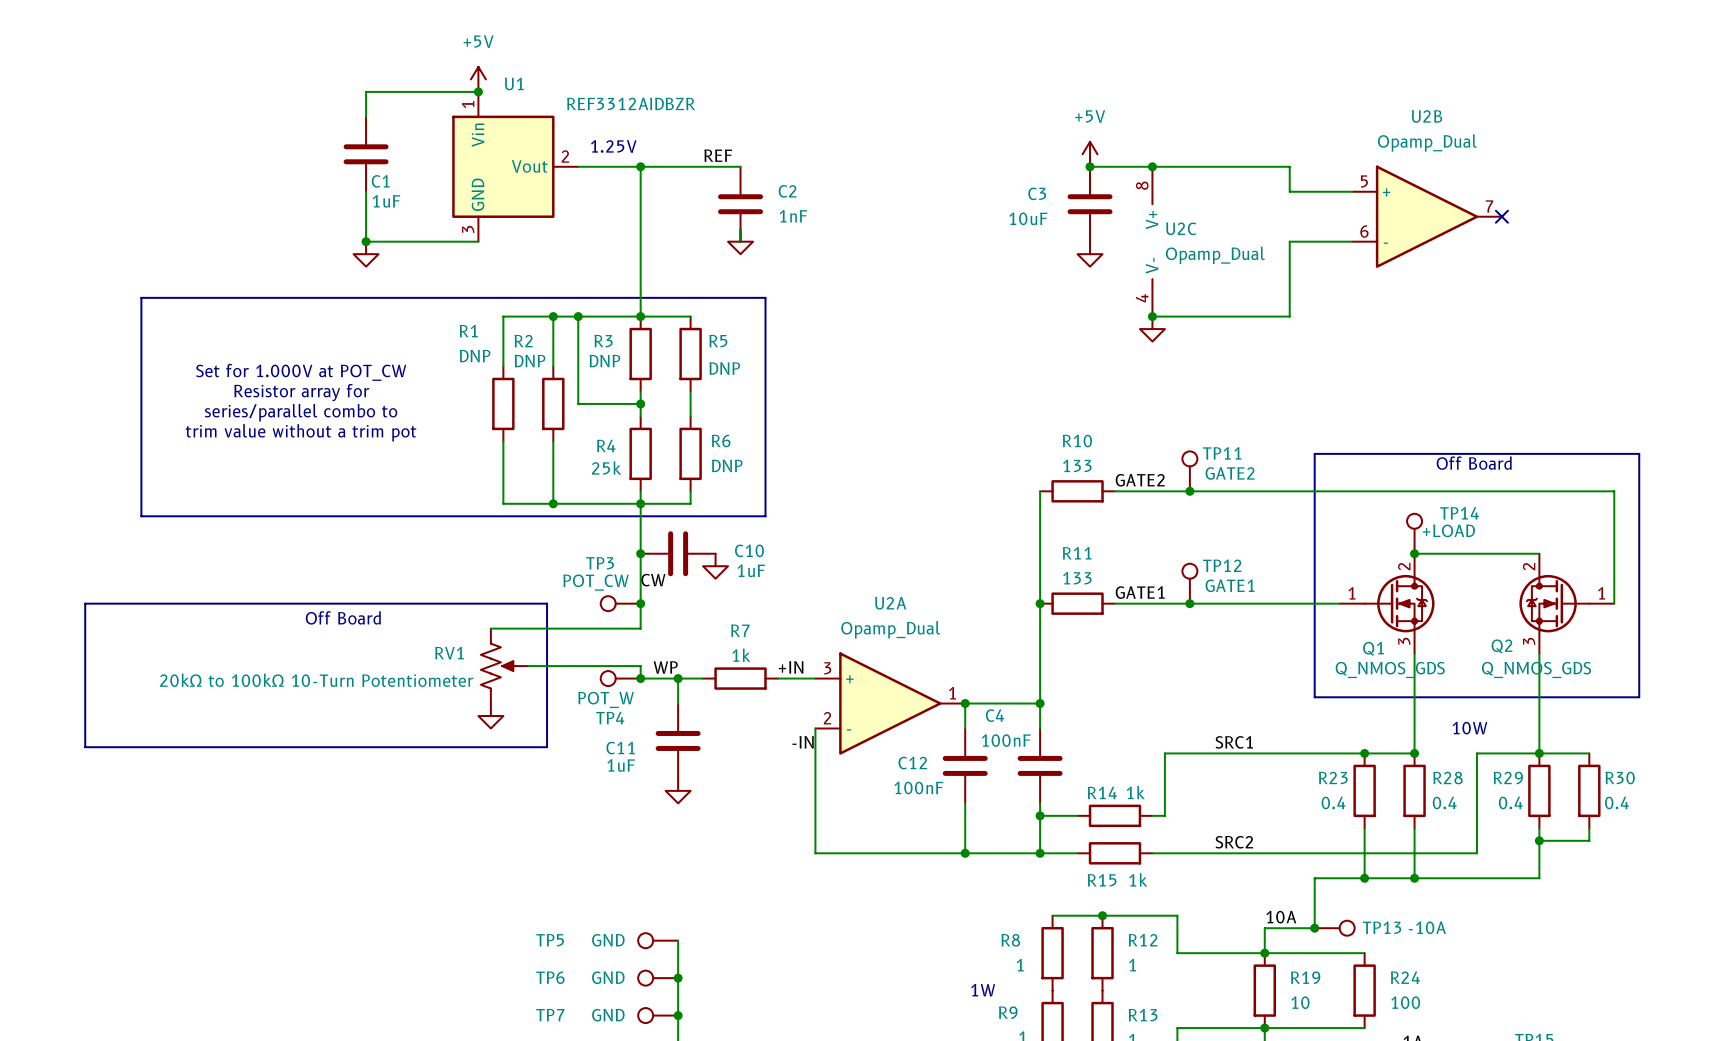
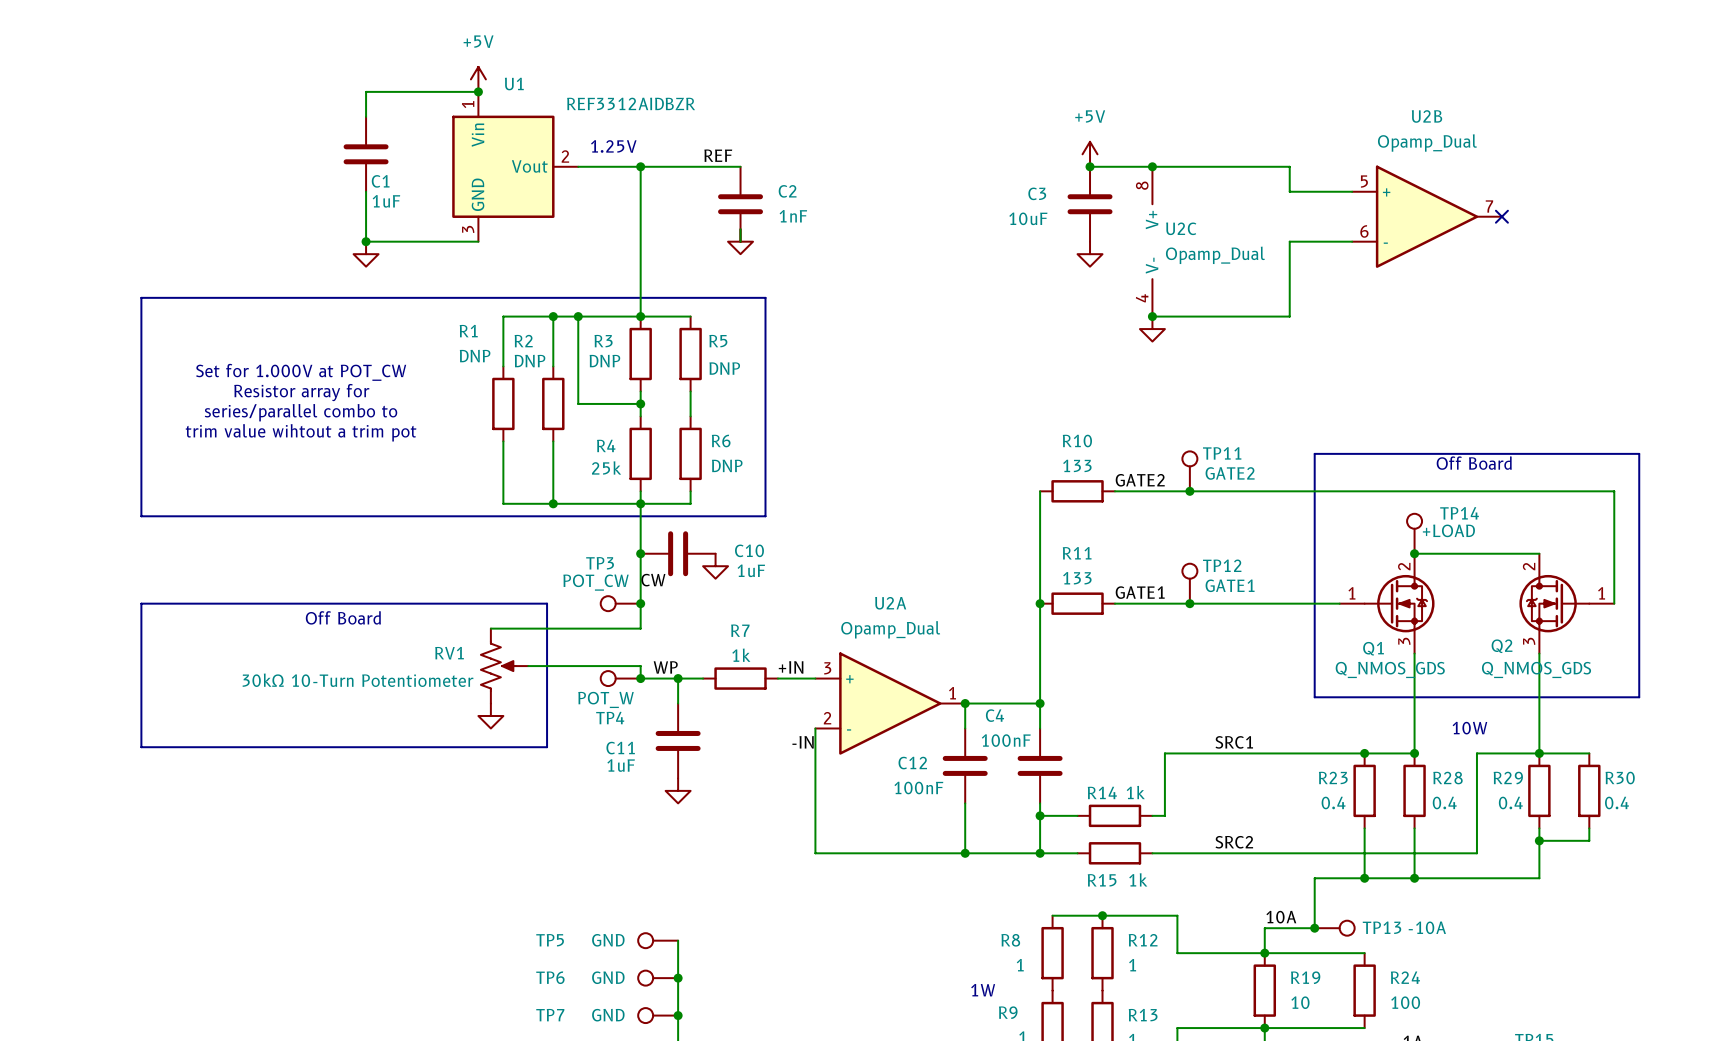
text: trim value without a trim pot (301, 432) -> trim value wihtout a trim pot (301, 432)
line: (141, 603) (85, 603) (85, 747) (141, 747) -> (141, 603) (141, 747)
RV1 value: 20kΩ to 100kΩ 10-Turn Potentiometer (316, 680) -> 30kΩ 10-Turn Potentiometer (358, 680)

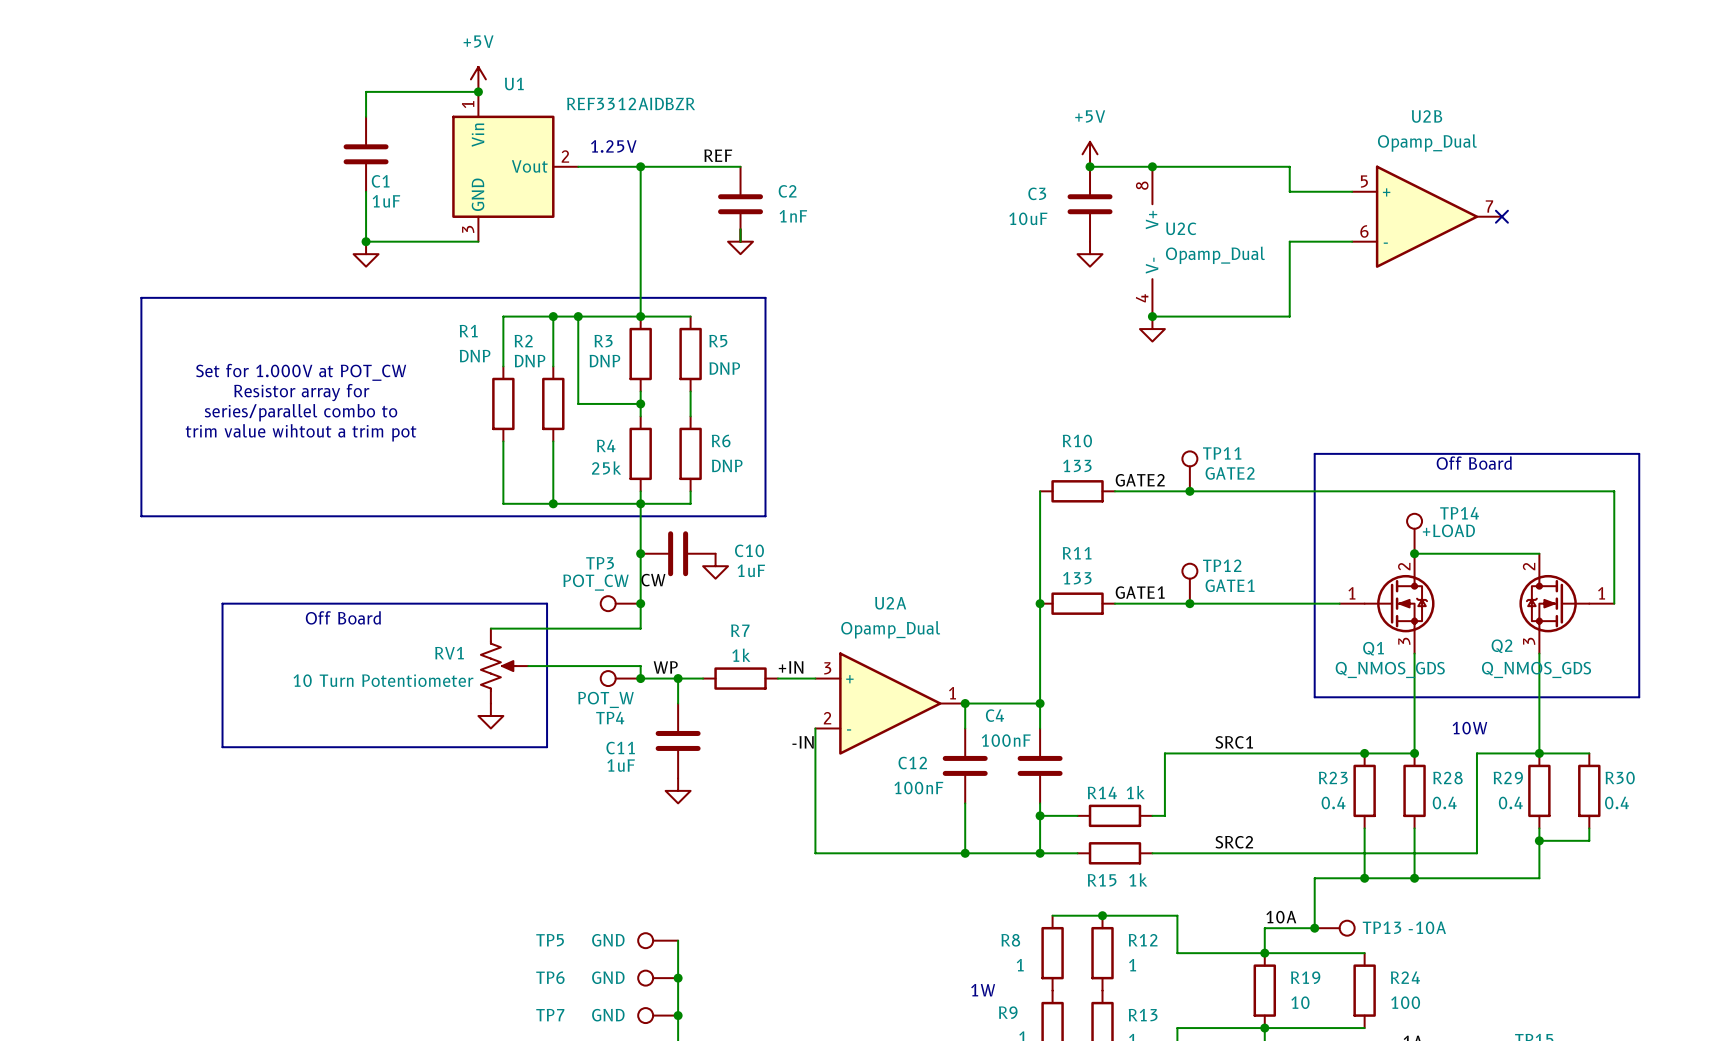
line: (222, 603) (141, 603) (141, 747) (222, 747) -> (222, 603) (222, 747)
RV1 value: 30kΩ 10-Turn Potentiometer (358, 680) -> 10 Turn Potentiometer (383, 680)

